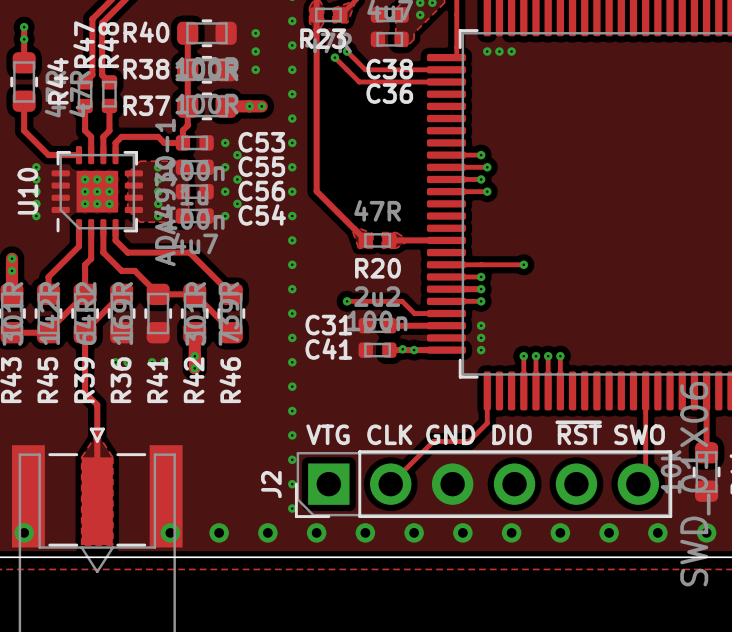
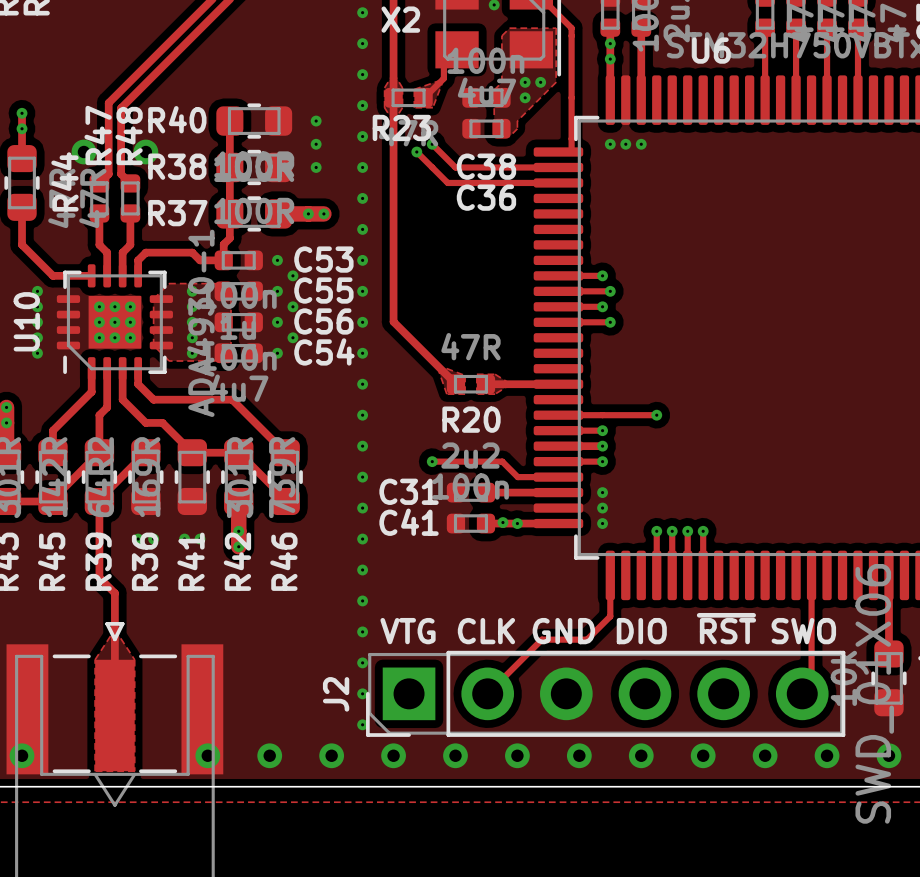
via: none -> (83, 152)
via: none -> (145, 152)

